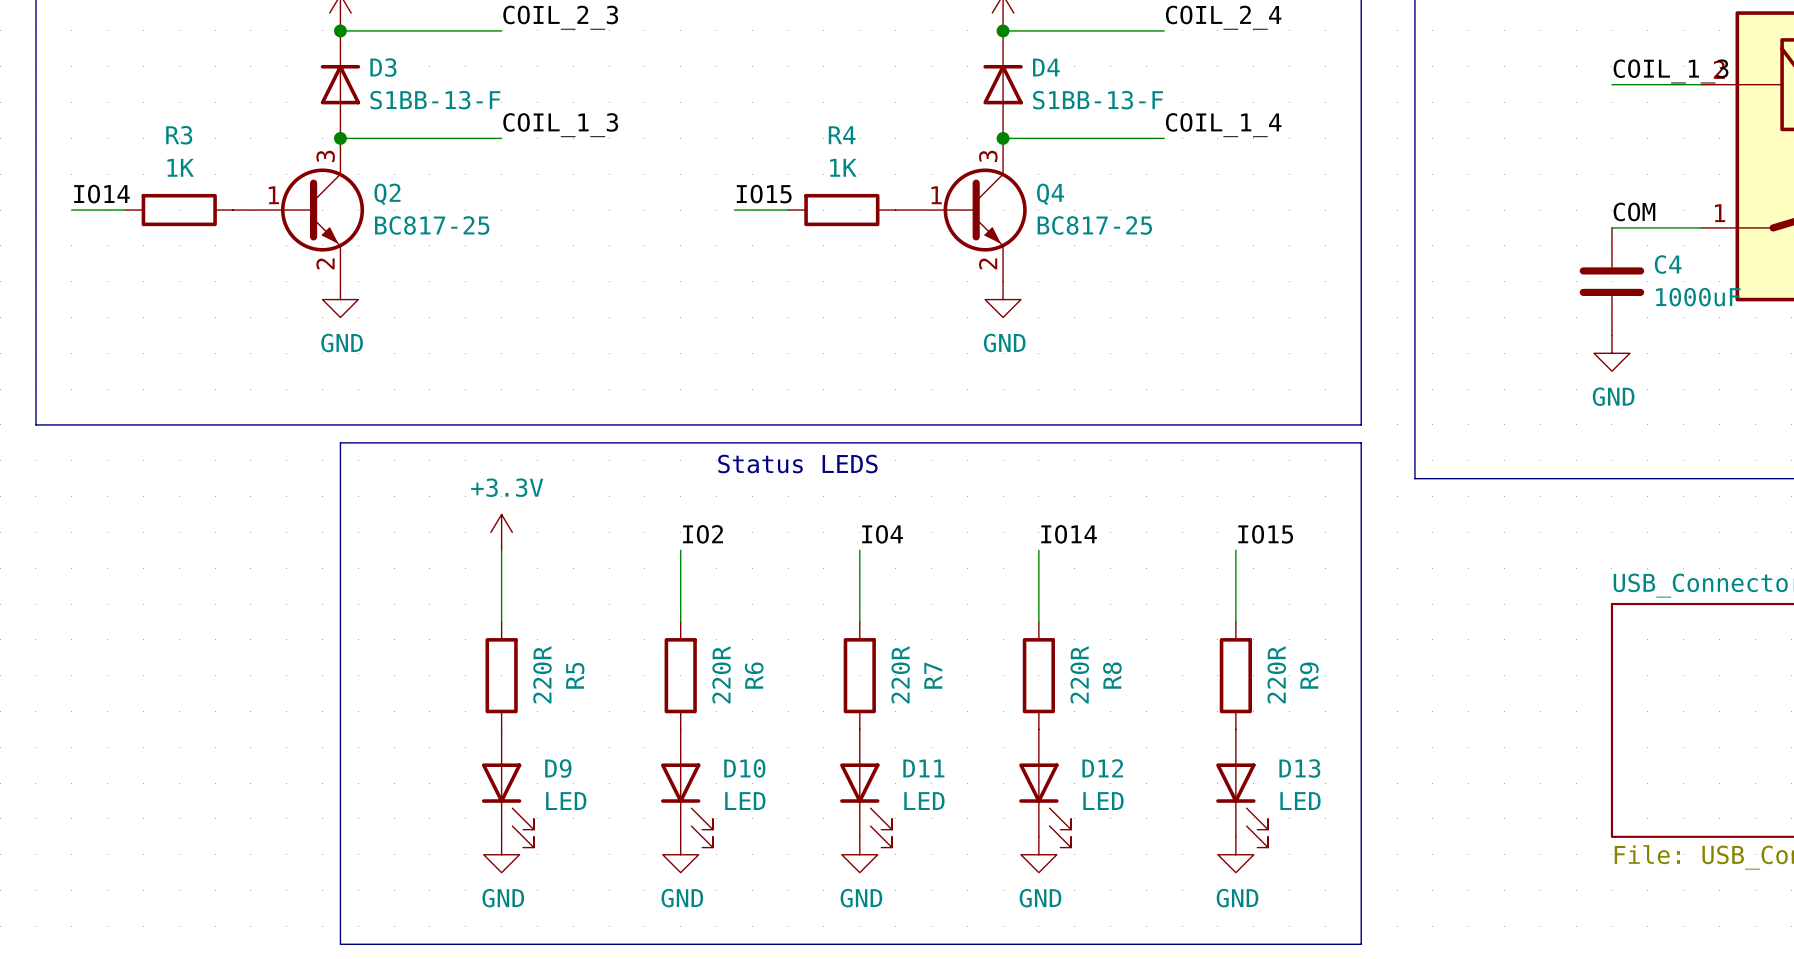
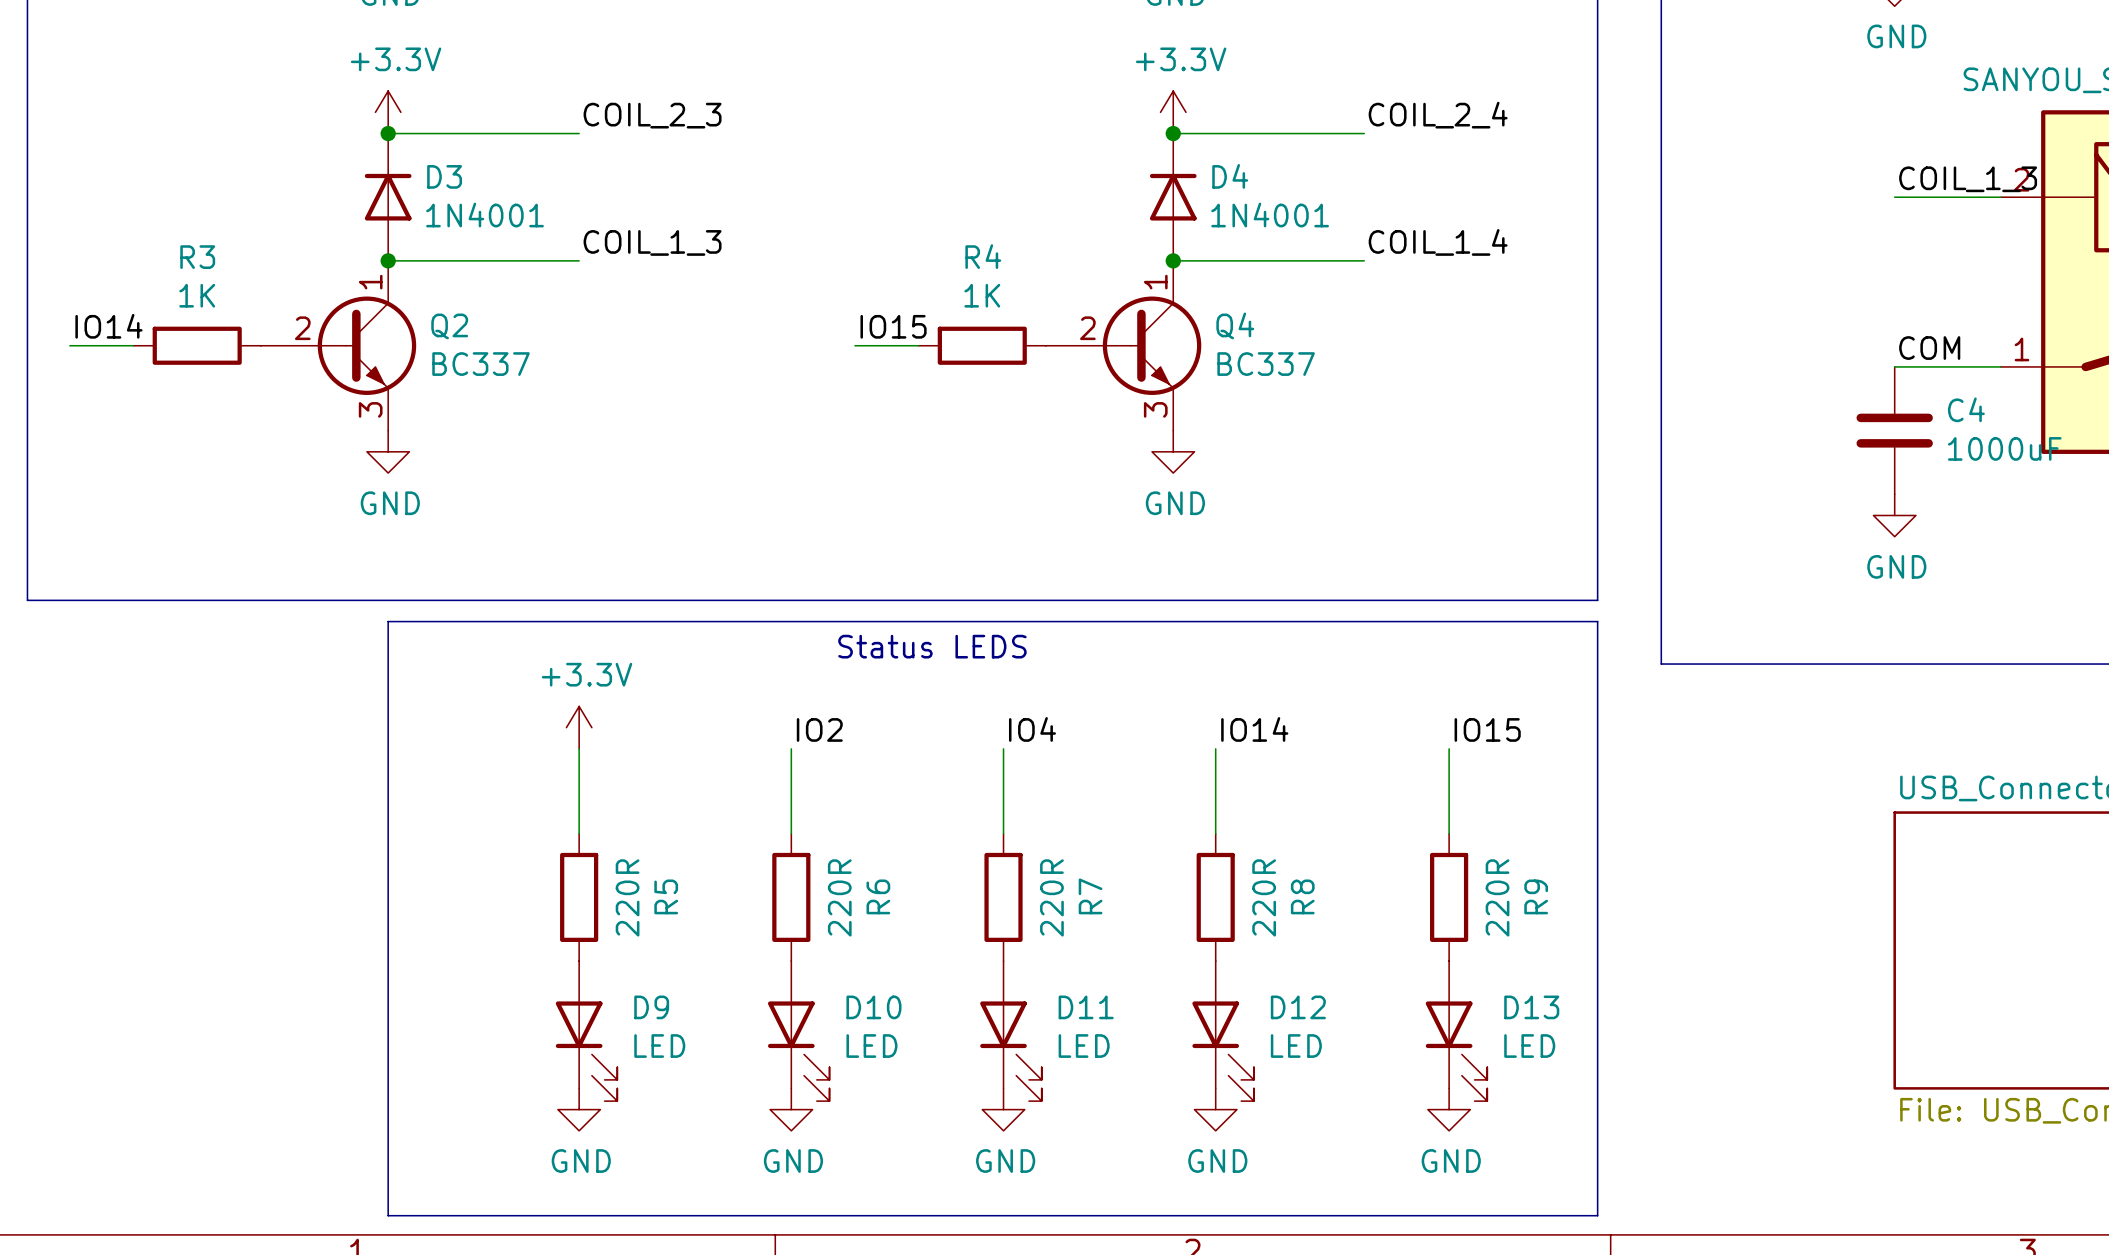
D3 value: S1BB-13-F (435, 100) -> 1N4001 (485, 215)
D4 value: S1BB-13-F (1098, 100) -> 1N4001 (1270, 215)
Q2 symbol: [232, 138, 365, 282] -> [260, 260, 417, 431]
Q4 symbol: [895, 138, 1027, 282] -> [1045, 260, 1202, 431]
Q2 value: BC817-25 (432, 225) -> BC337 (481, 364)
Q4 value: BC817-25 (1094, 225) -> BC337 (1266, 364)

